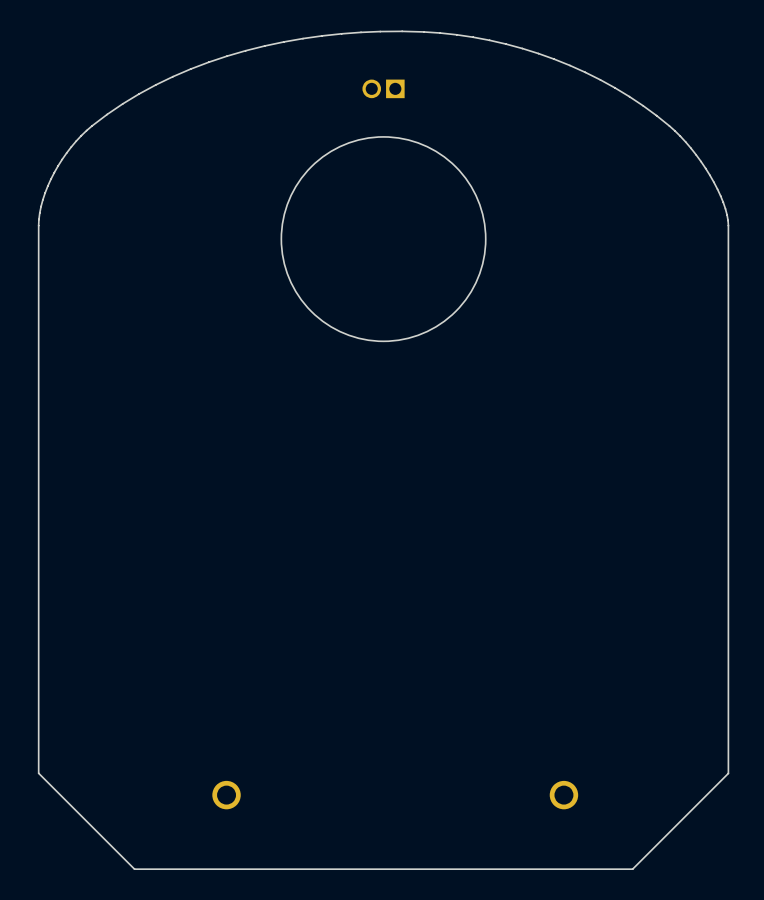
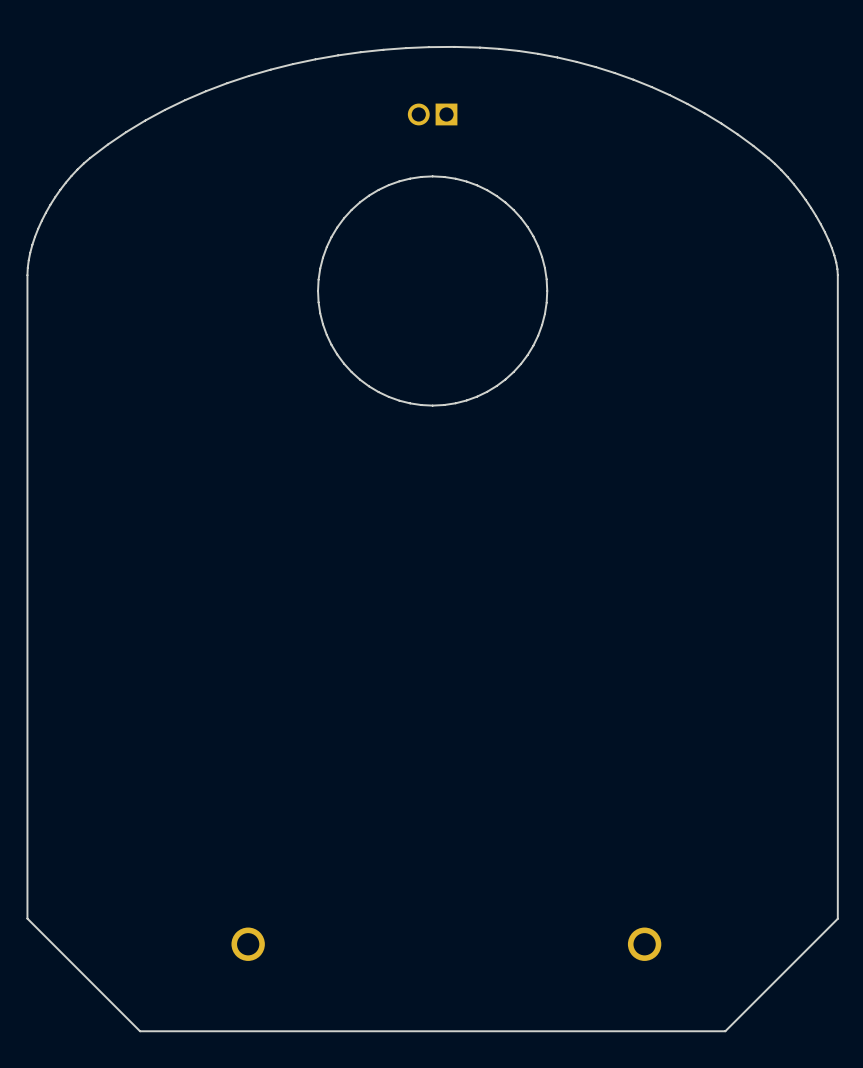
round board edge: [281, 136, 486, 342] -> none
board edge: none -> (432, 176) (410, 178) (388, 185) (369, 195) (351, 209) (337, 227) (326, 247) (320, 268) (318, 291) (320, 313) (326, 334) (337, 354) (351, 372) (369, 386) (388, 396) (410, 403) (432, 405) (455, 403) (477, 396) (496, 386) (513, 372) (527, 355) (538, 335) (544, 314) (547, 291) (544, 267) (538, 246) (527, 226) (513, 209) (496, 195) (477, 185) (455, 178) (432, 176)

